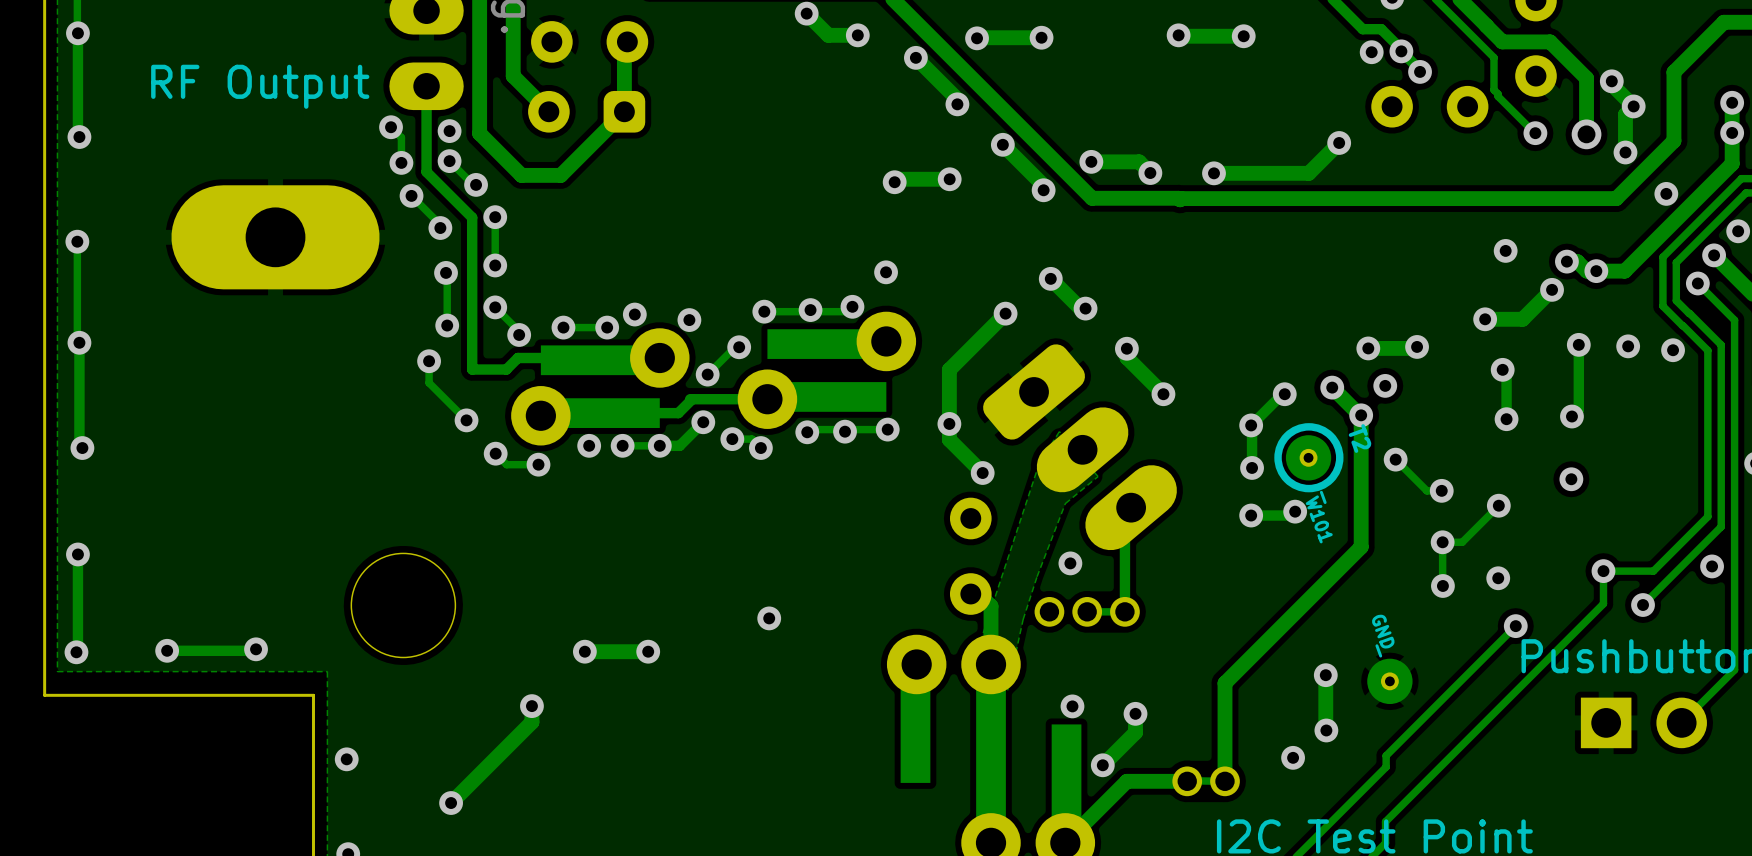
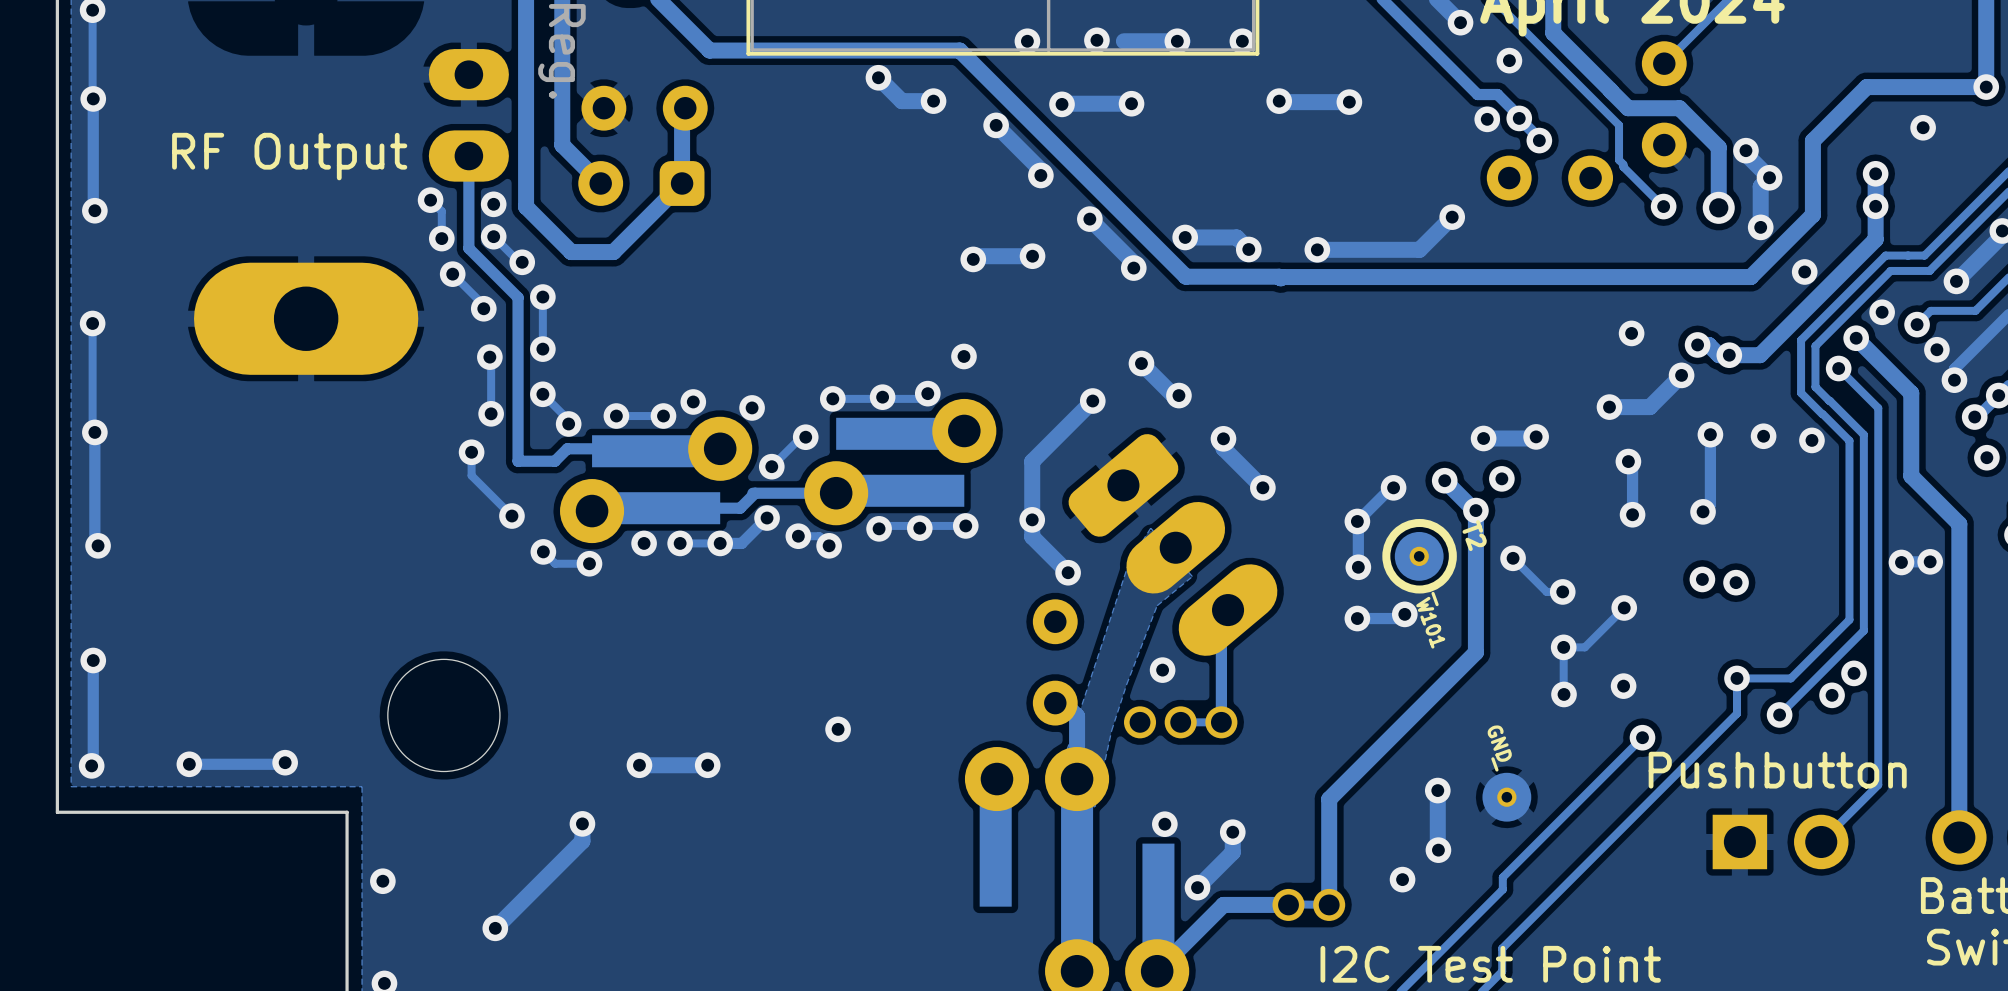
via: none -> (1736, 582)
via: none -> (1832, 695)

